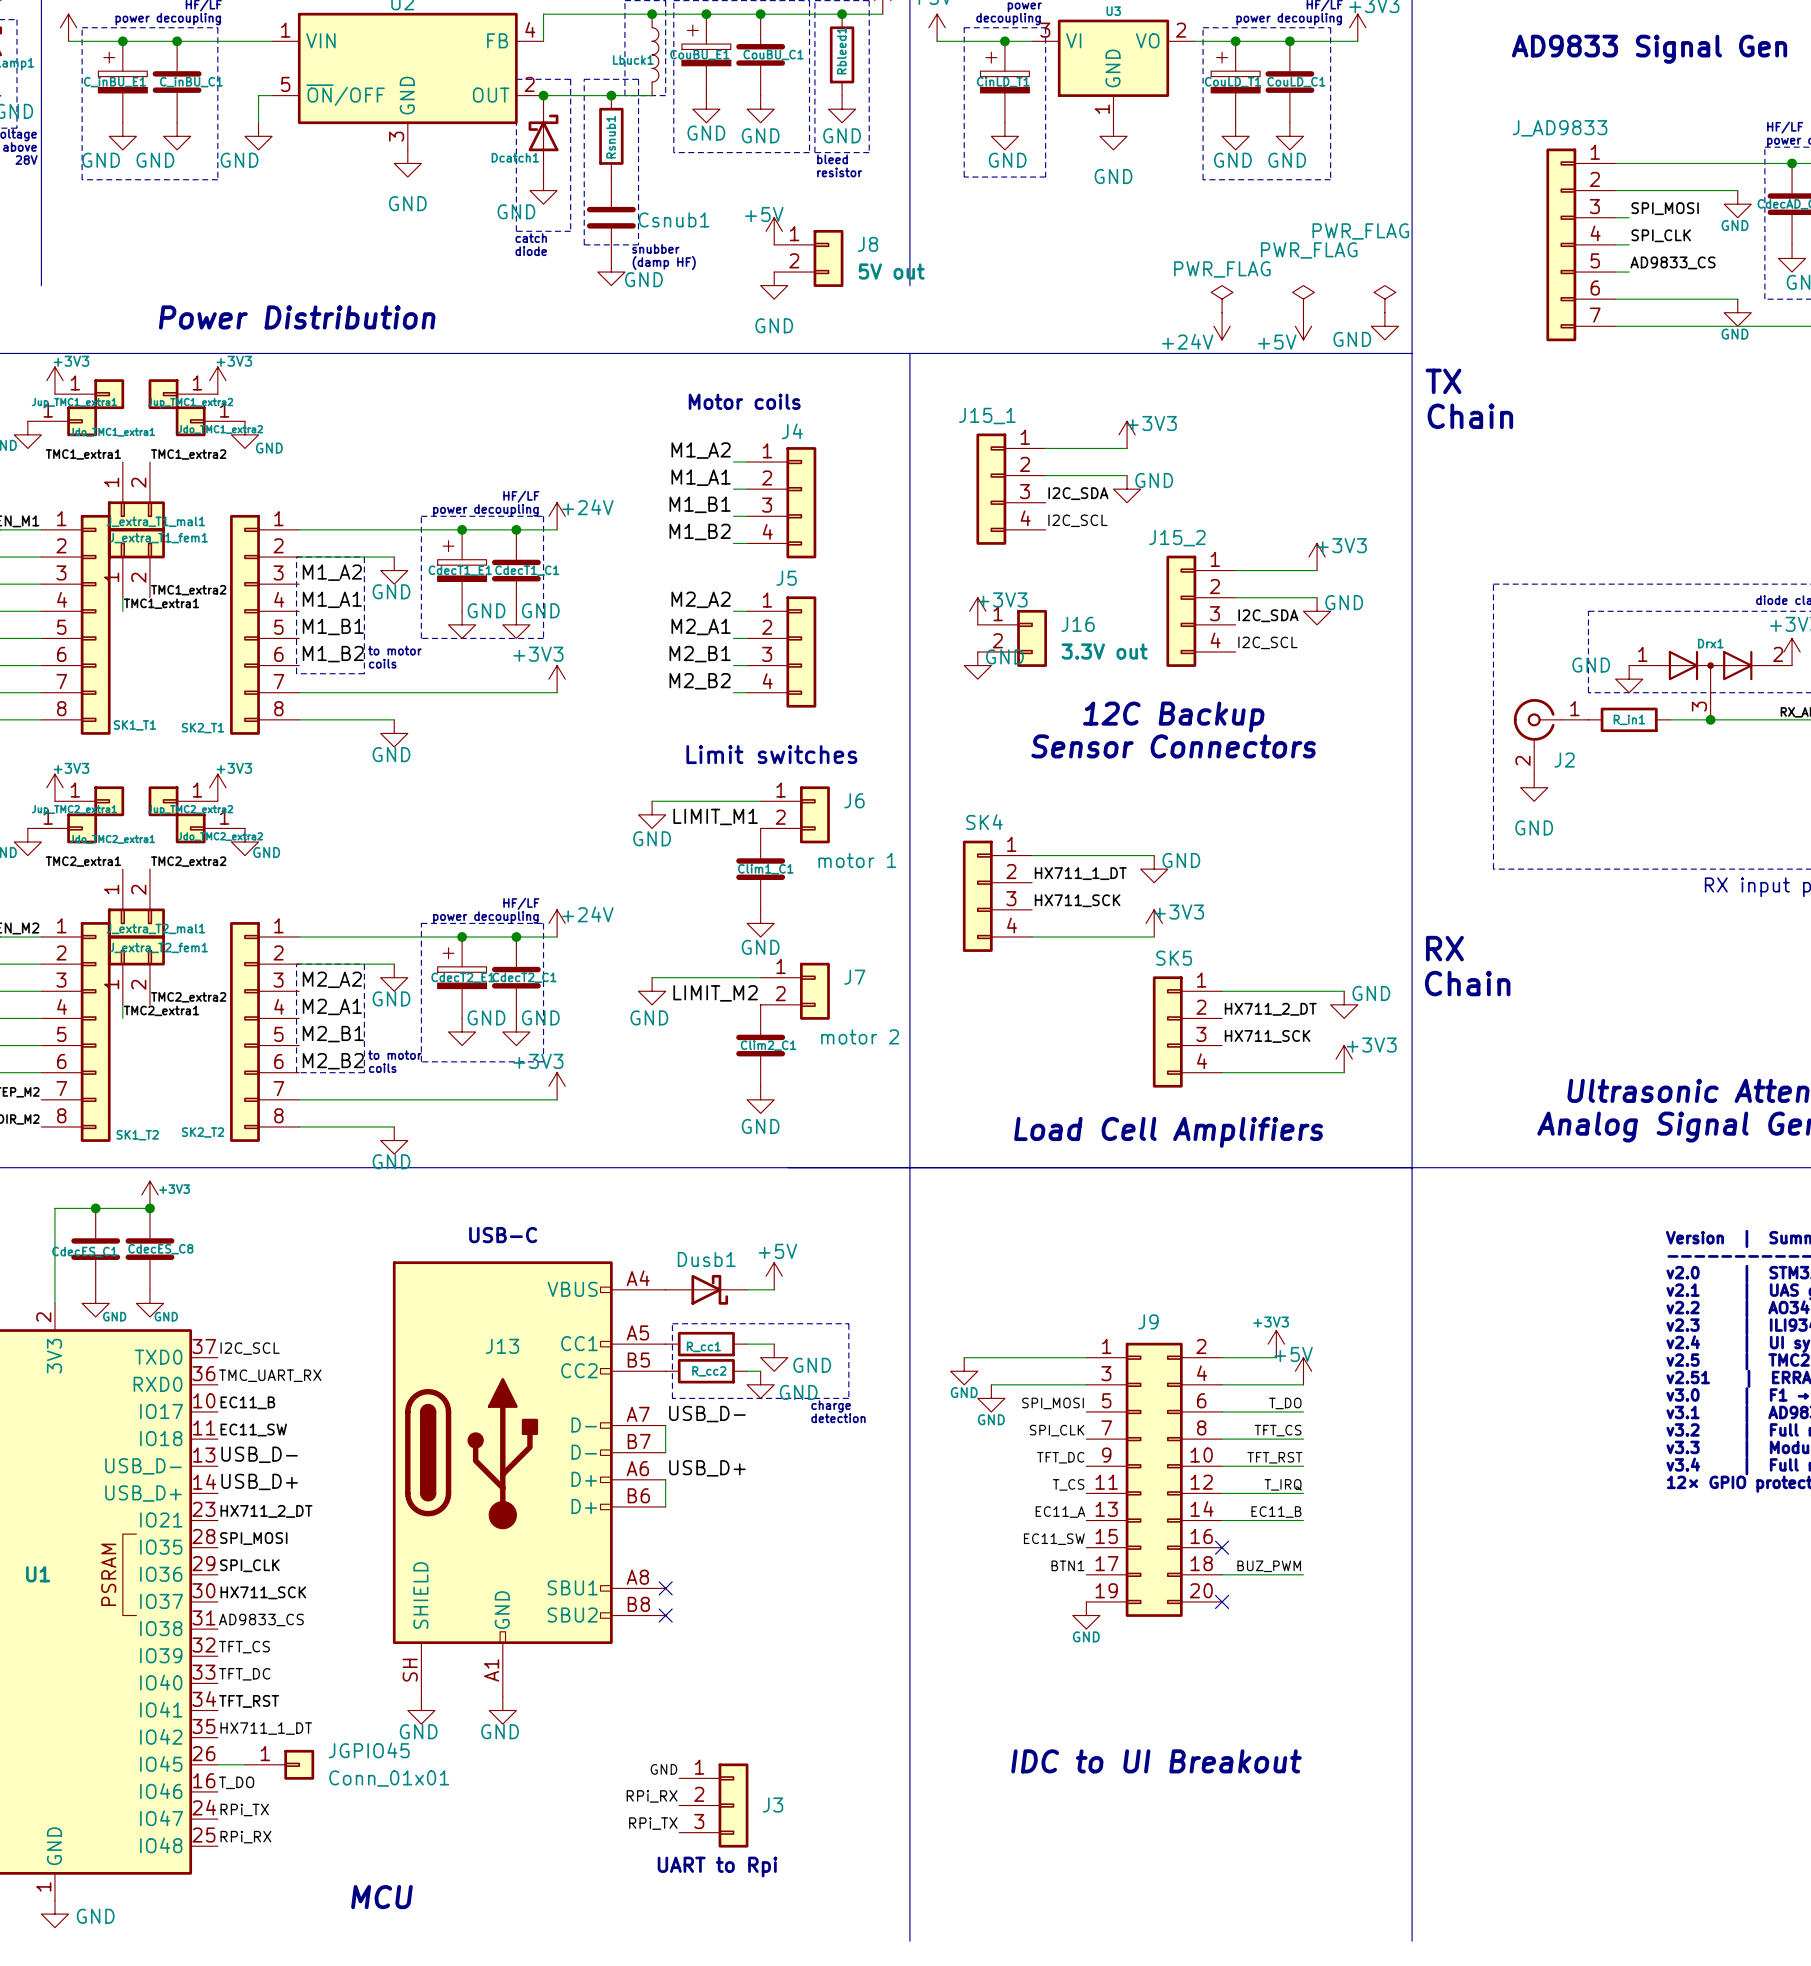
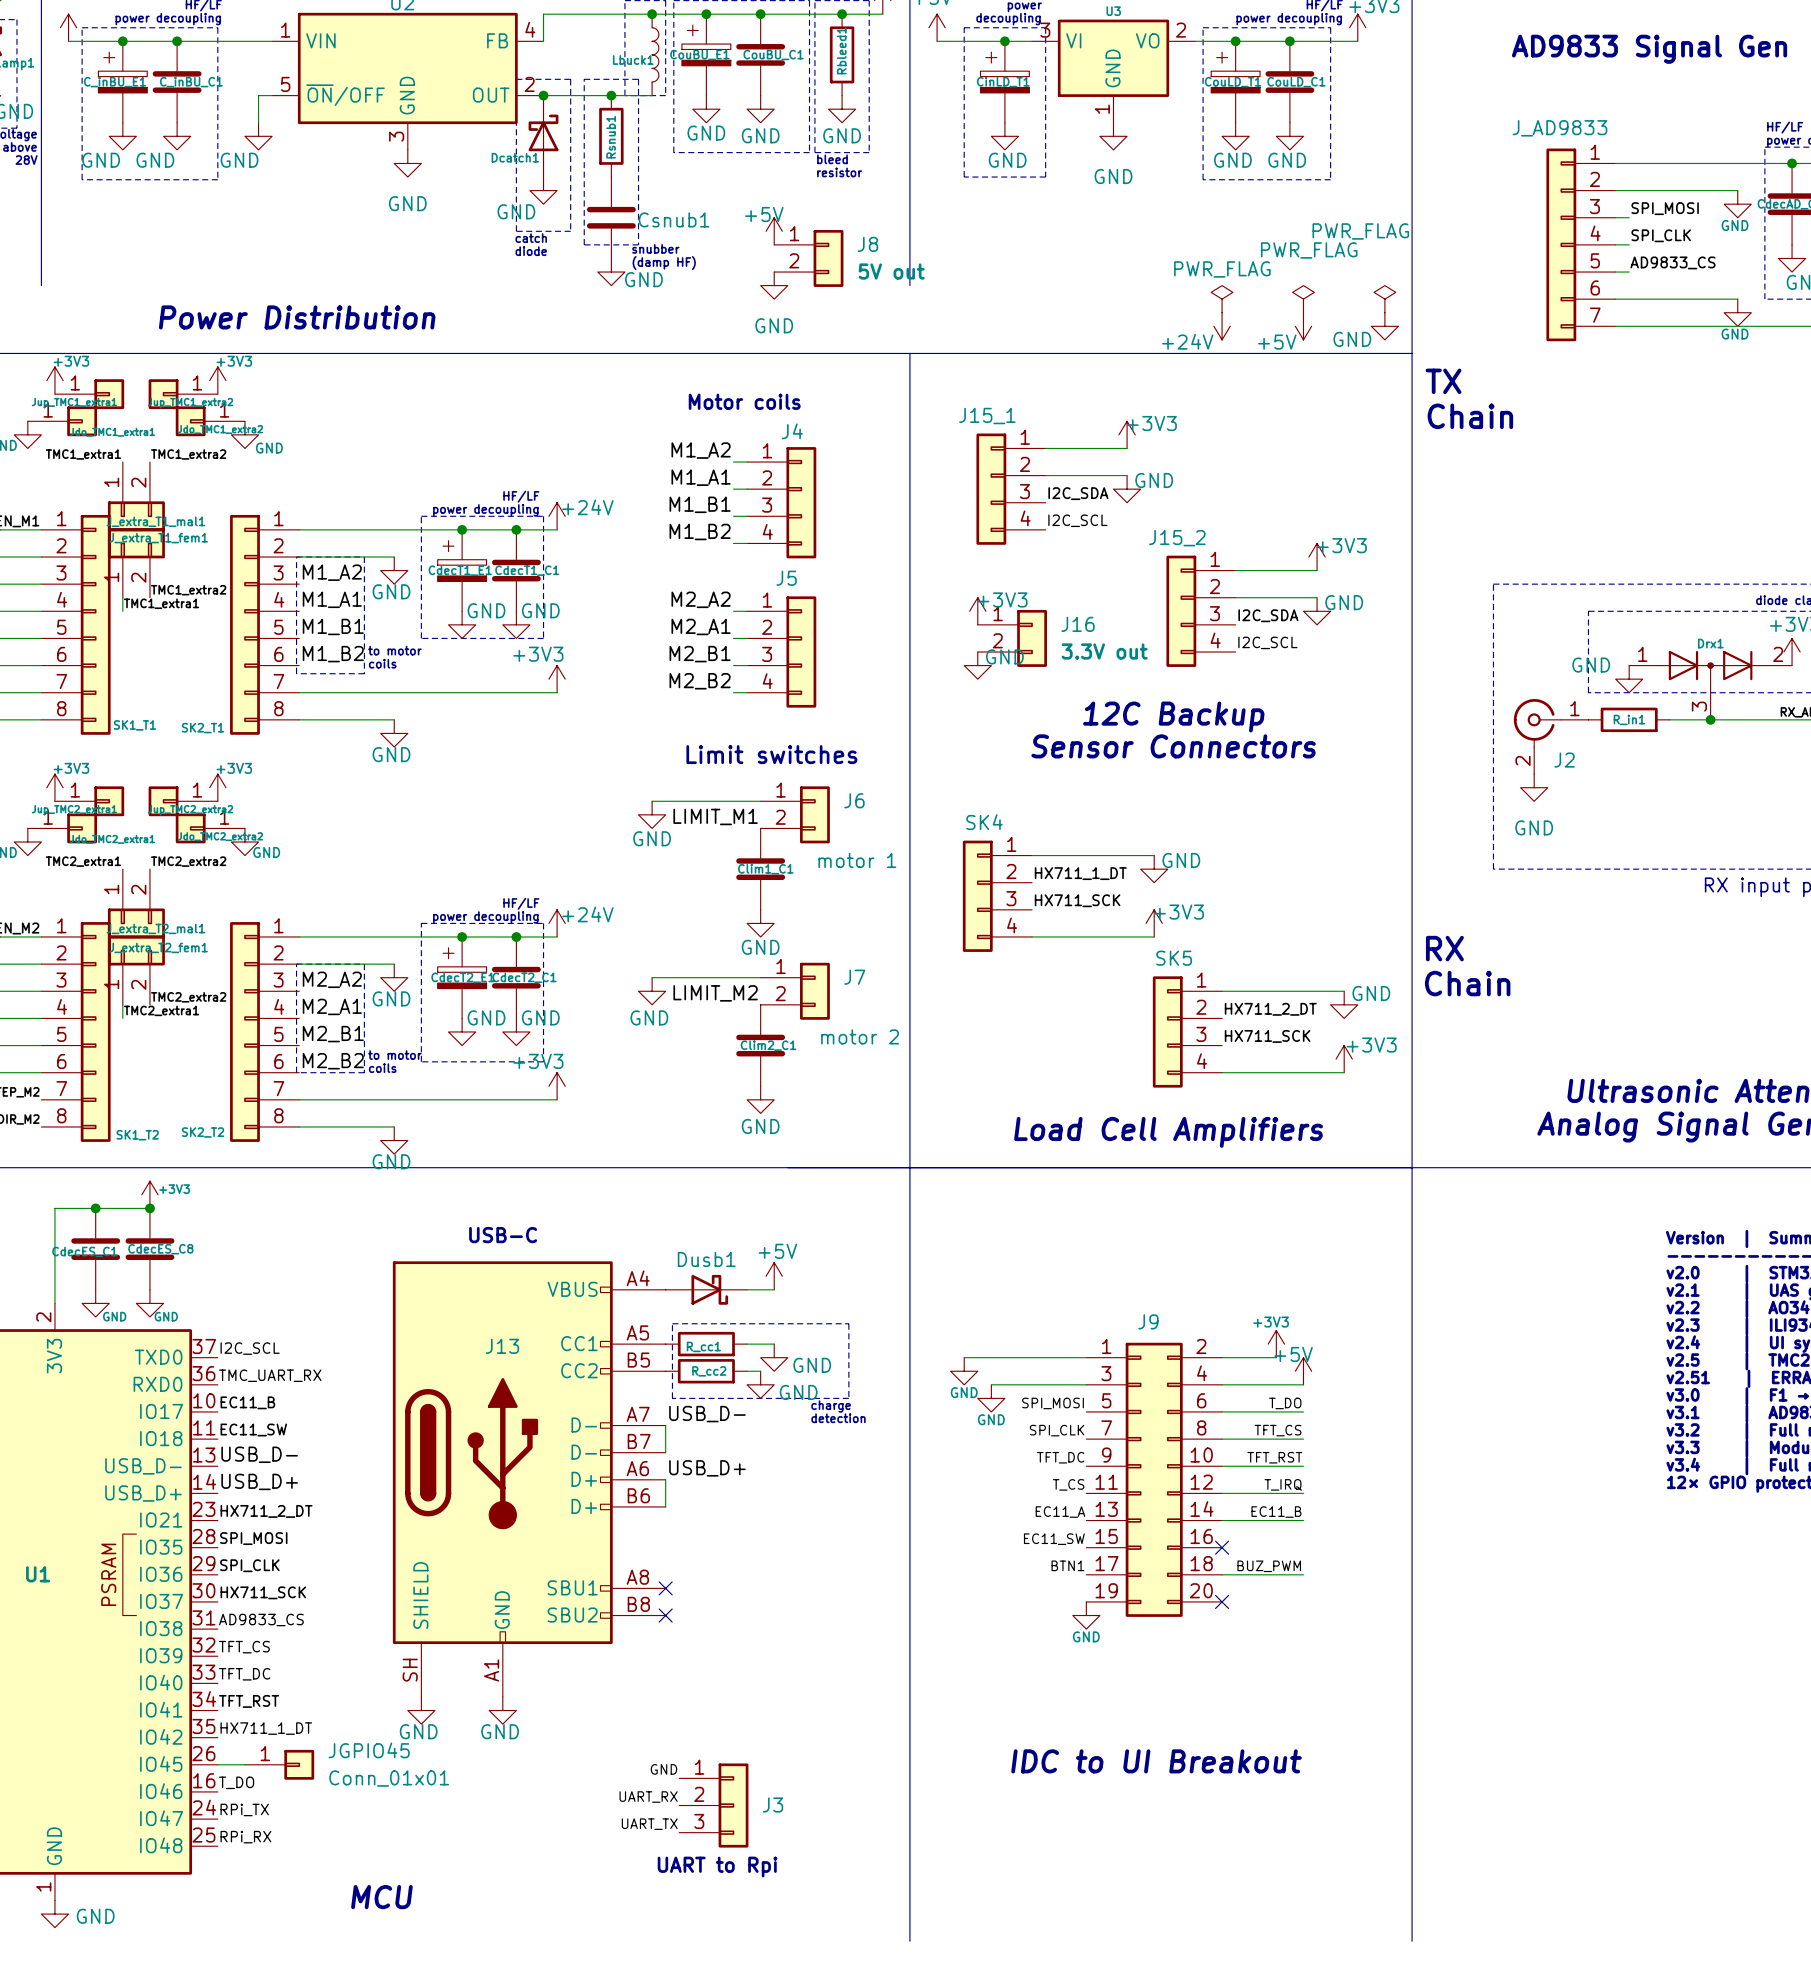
label: RPi_RX (652, 1796) -> UART_RX (648, 1797)
label: RPi_TX (653, 1823) -> UART_TX (649, 1824)

